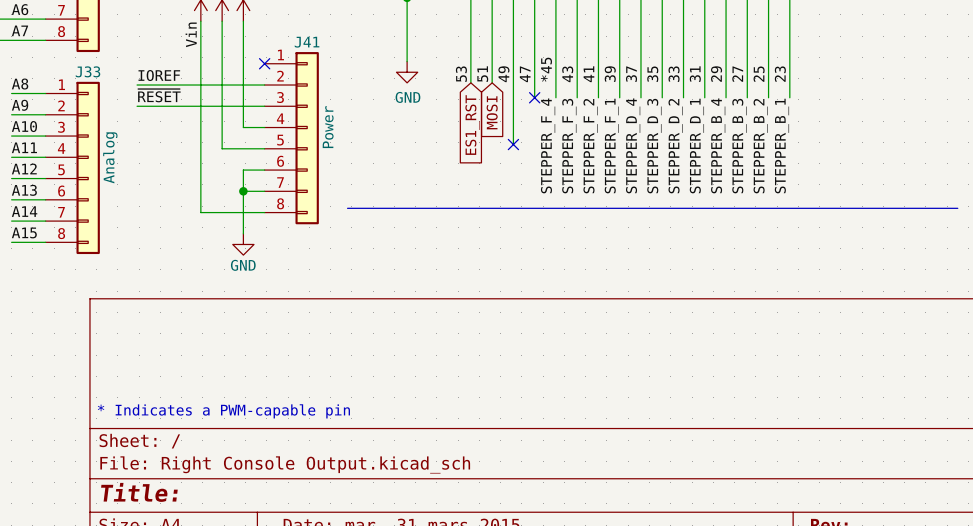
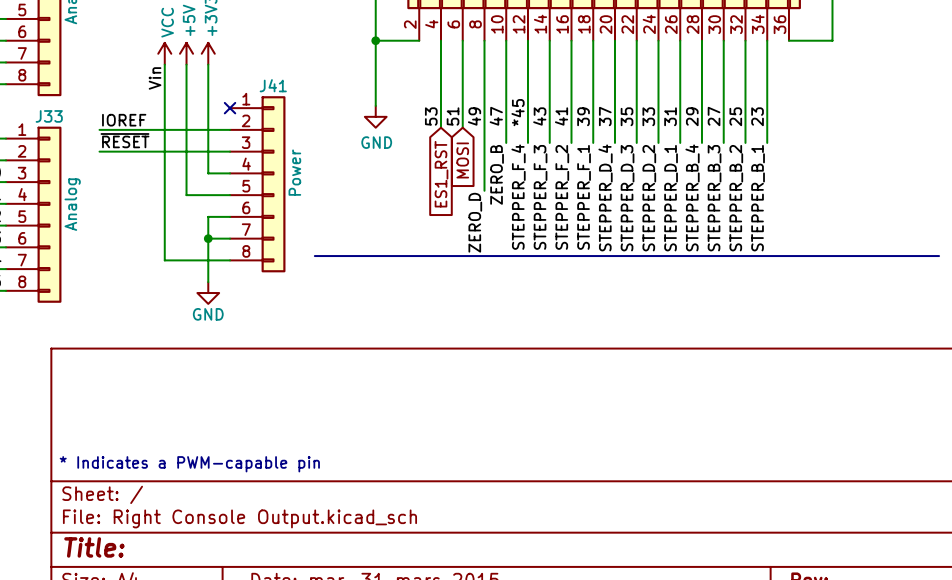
no-connect mark: (534, 97) -> none
label: none -> ZERO_B (497, 174)
no-connect mark: (513, 144) -> none
label: none -> ZERO_D (475, 222)

